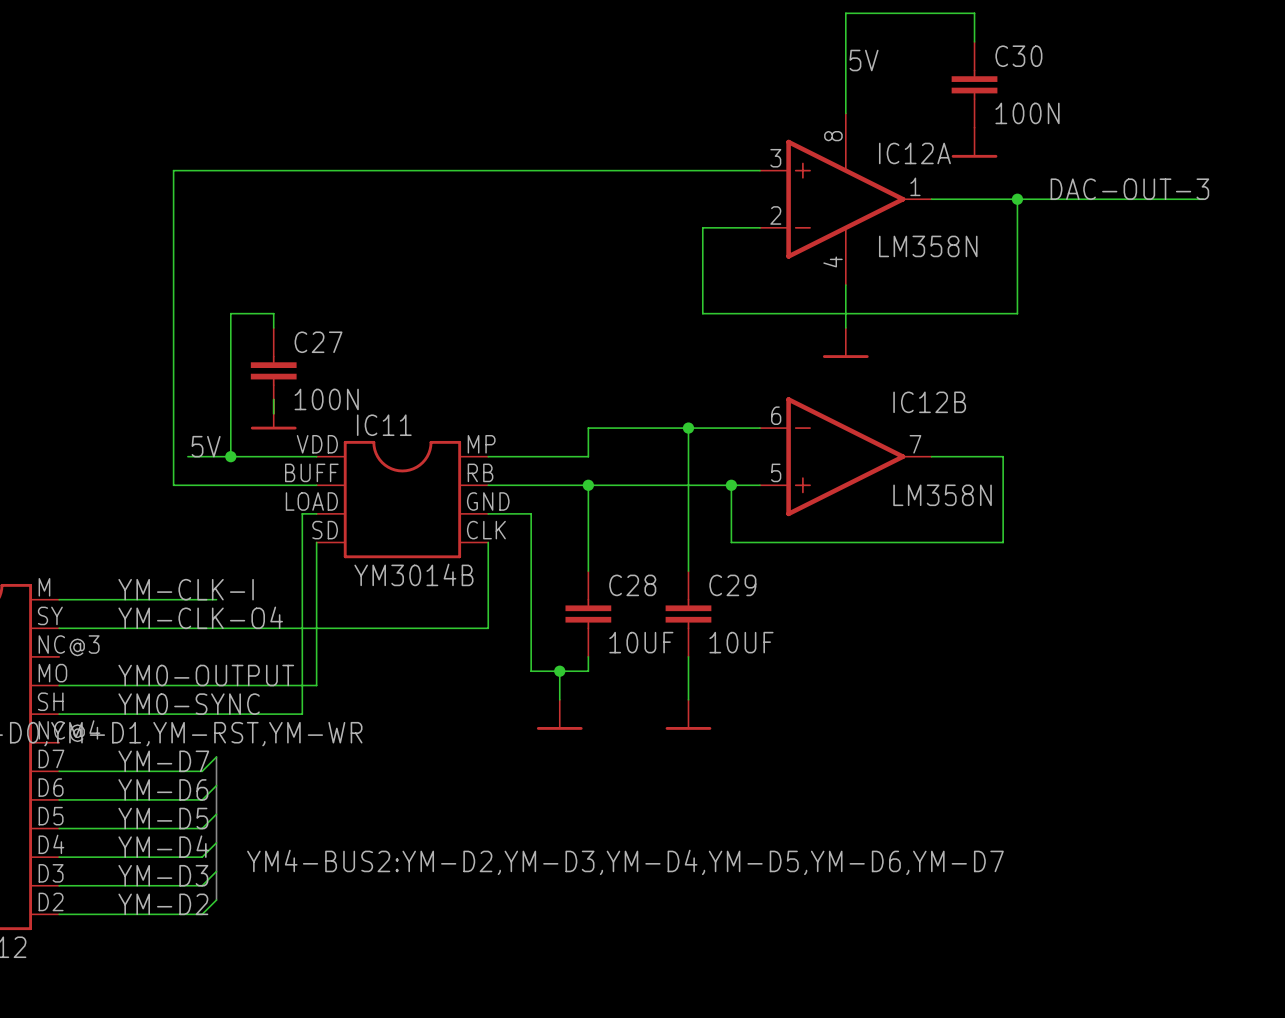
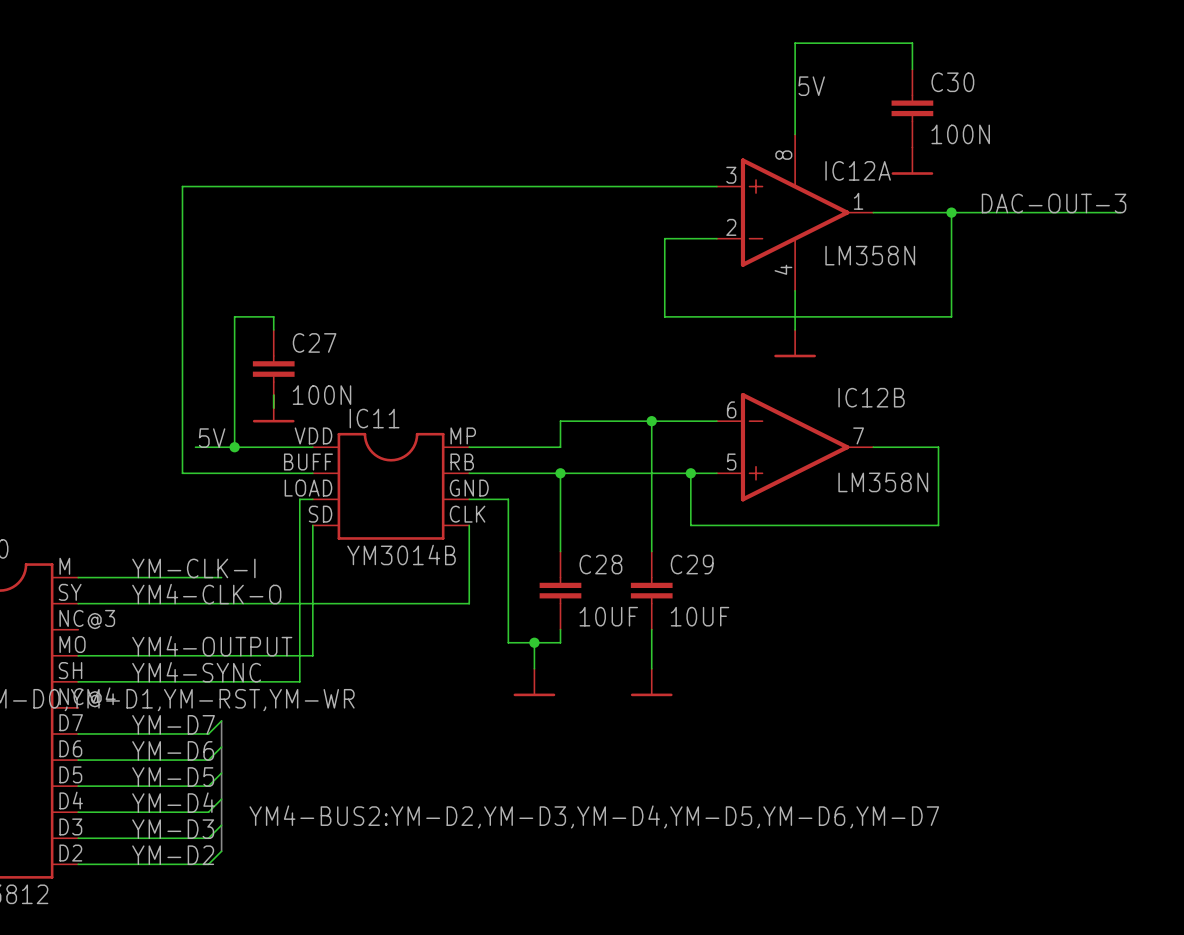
label: YM-CLK-O4 (200, 617) -> YM4-CLK-O (206, 594)
label: YM0-OUTPUT (206, 675) -> YM4-OUTPUT (212, 646)
label: YM0-SYNC (189, 704) -> YM4-SYNC (196, 672)

